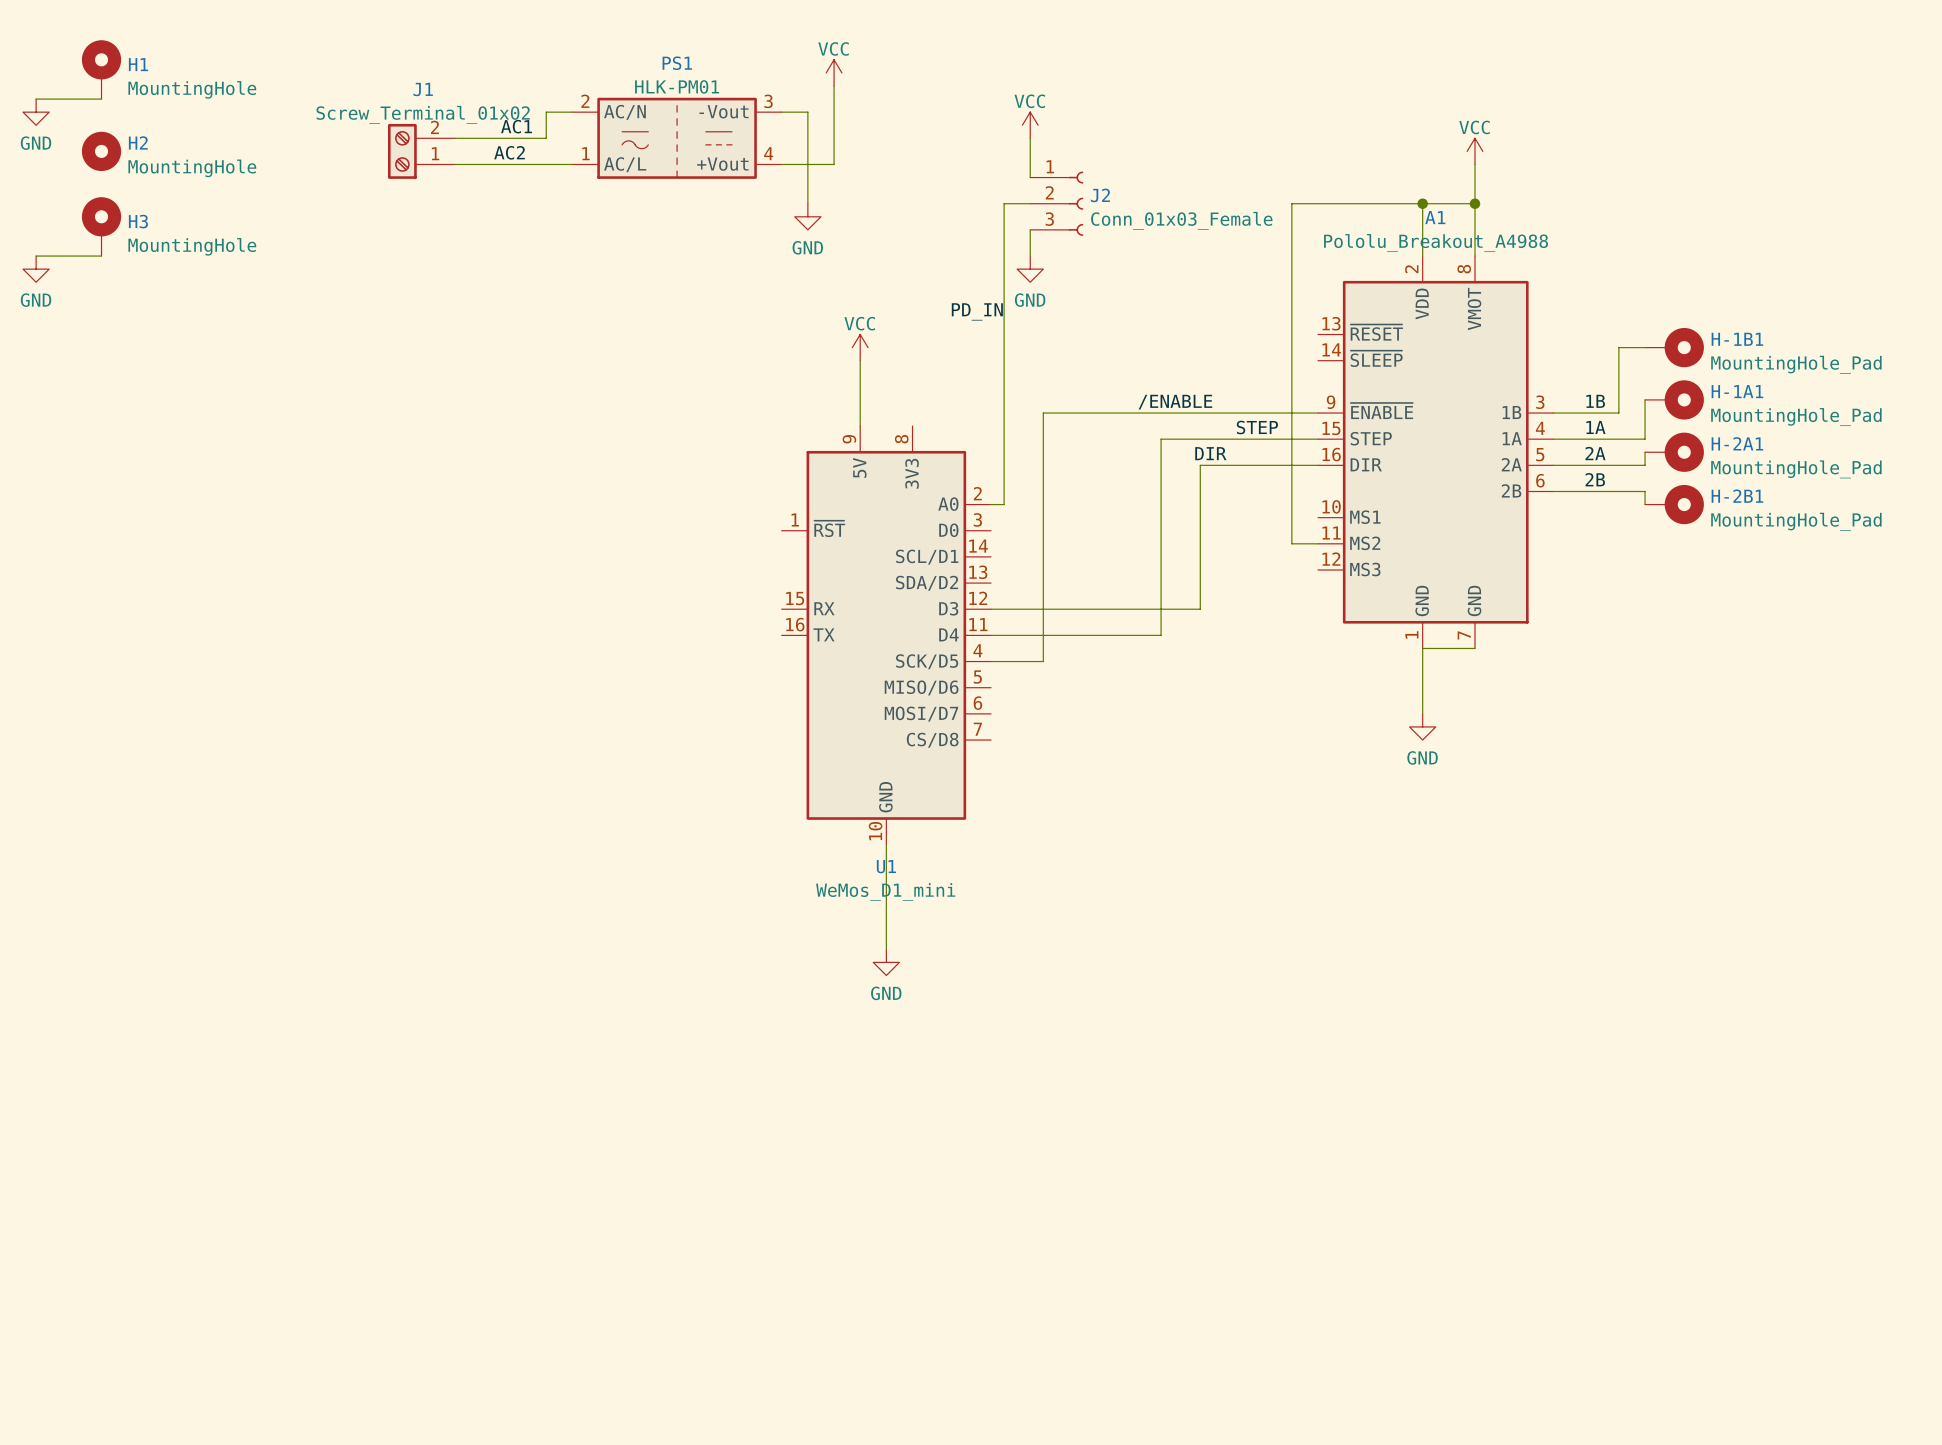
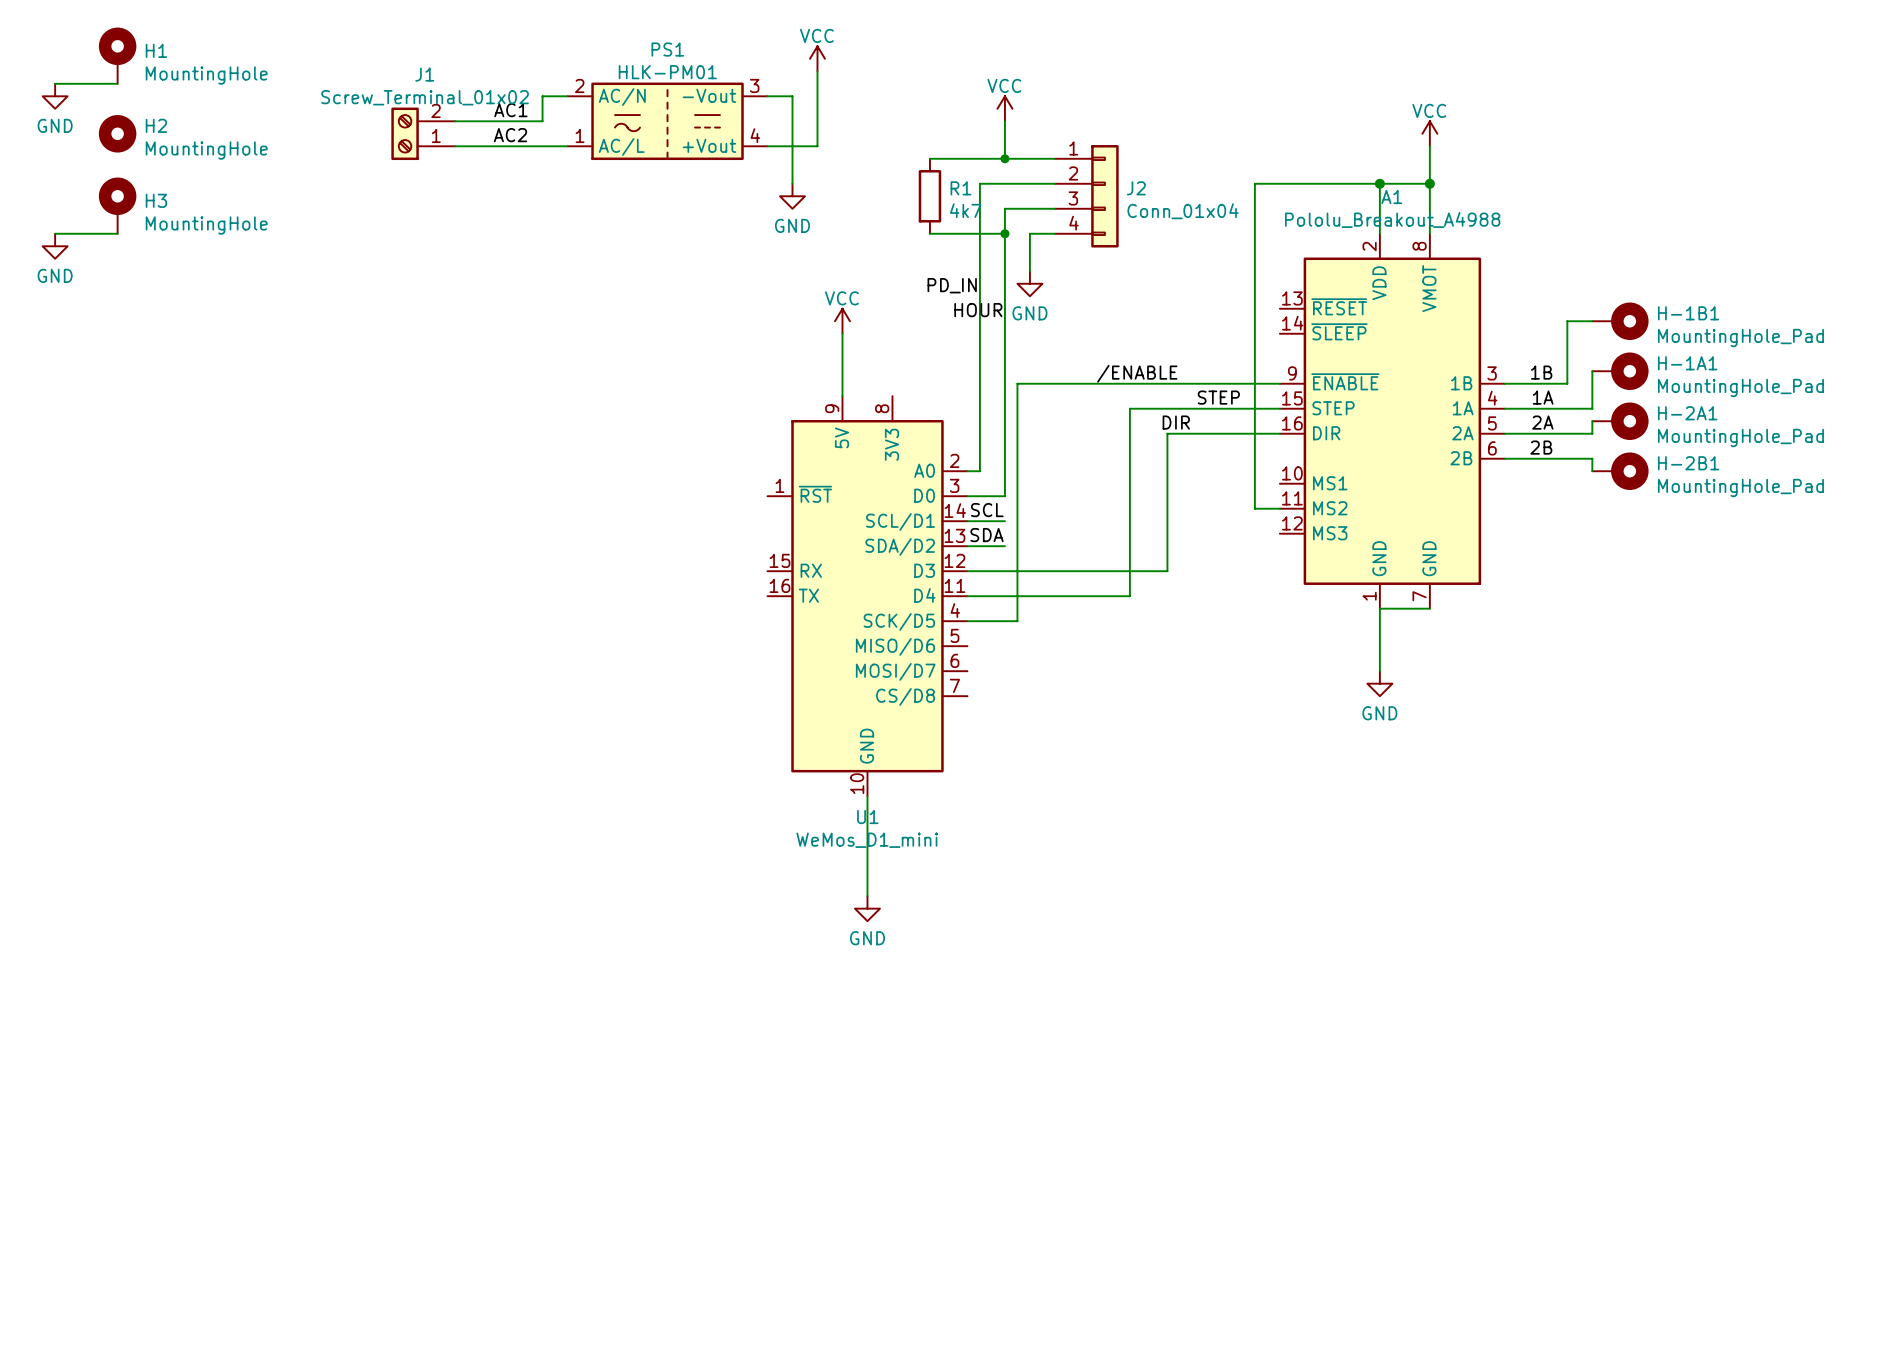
J2 symbol: [1030, 171, 1084, 236] -> [1054, 145, 1119, 248]
wire: none -> (929, 158) (1054, 158)
junction: none -> (1004, 158)
R1: none -> 4k7 (929, 196)
J2 value: Conn_01x03_Female (1181, 220) -> Conn_01x04 (1183, 211)
wire: none -> (929, 233) (1004, 233) (1004, 496) (967, 496)
junction: none -> (1004, 233)
wire: none -> (1054, 233) (1029, 233) (1029, 271)
power symbol position: GND (1030, 269) -> GND (1029, 283)
label: none -> HOUR (978, 310)
label: none -> SCL (987, 510)
wire: none -> (967, 521) (1004, 521)
label: none -> SDA (987, 535)
wire: none -> (967, 546) (1004, 546)

